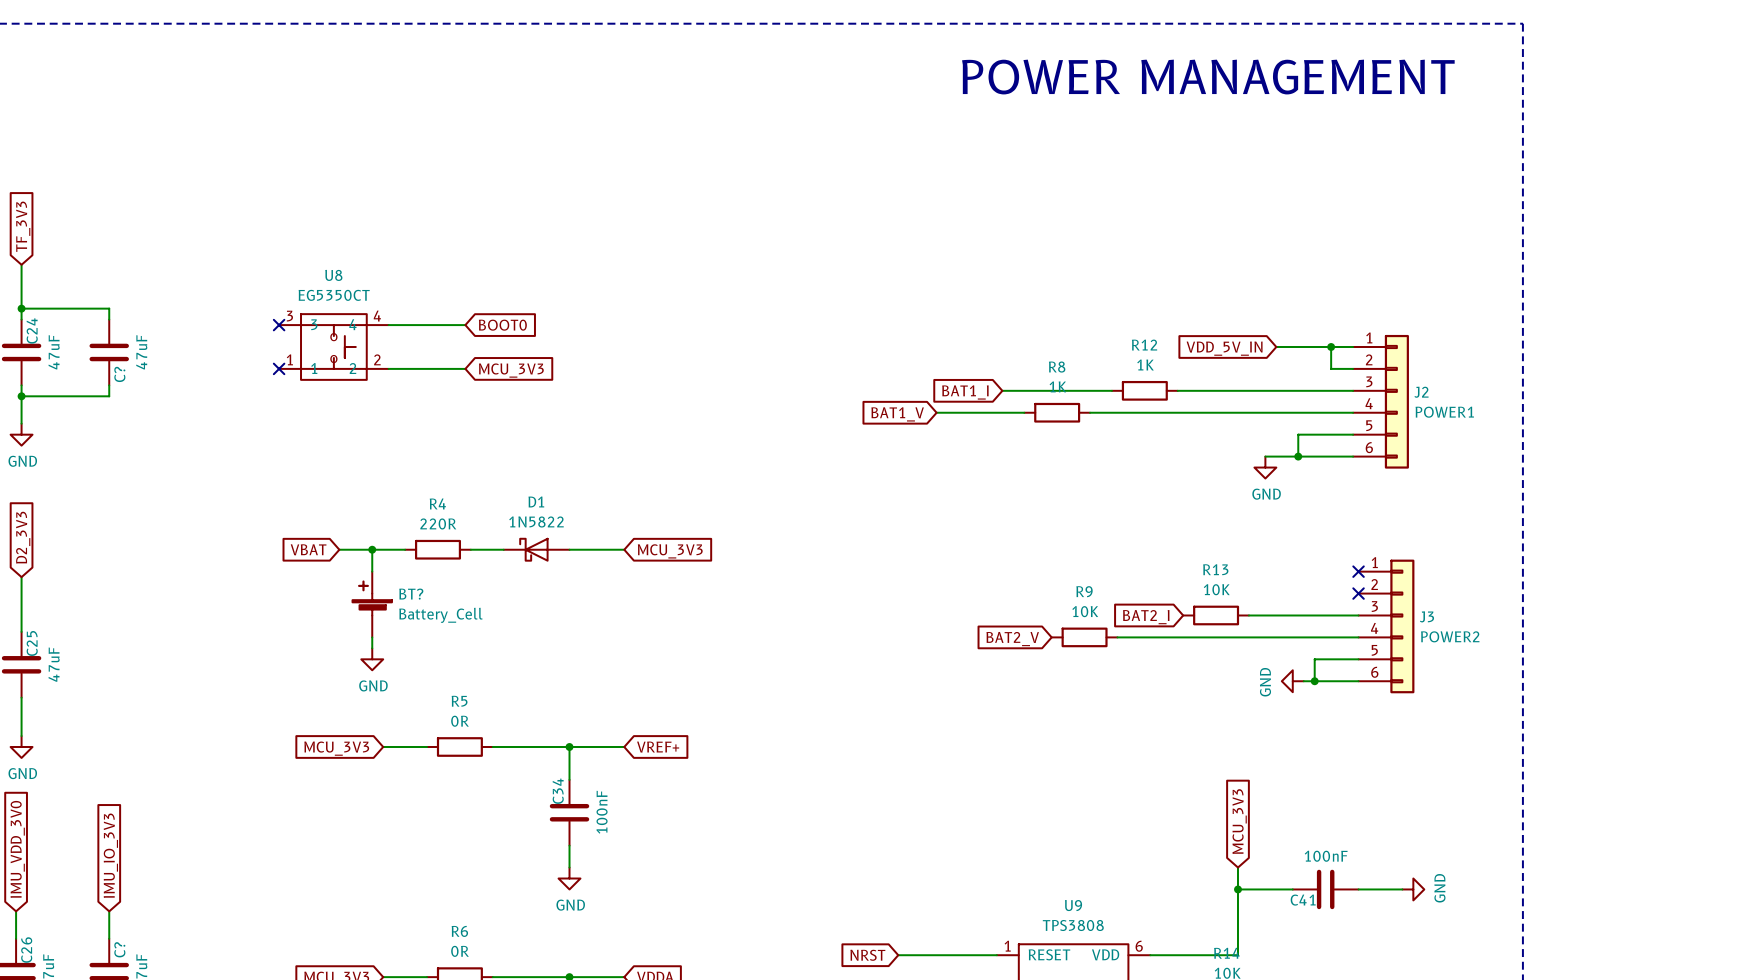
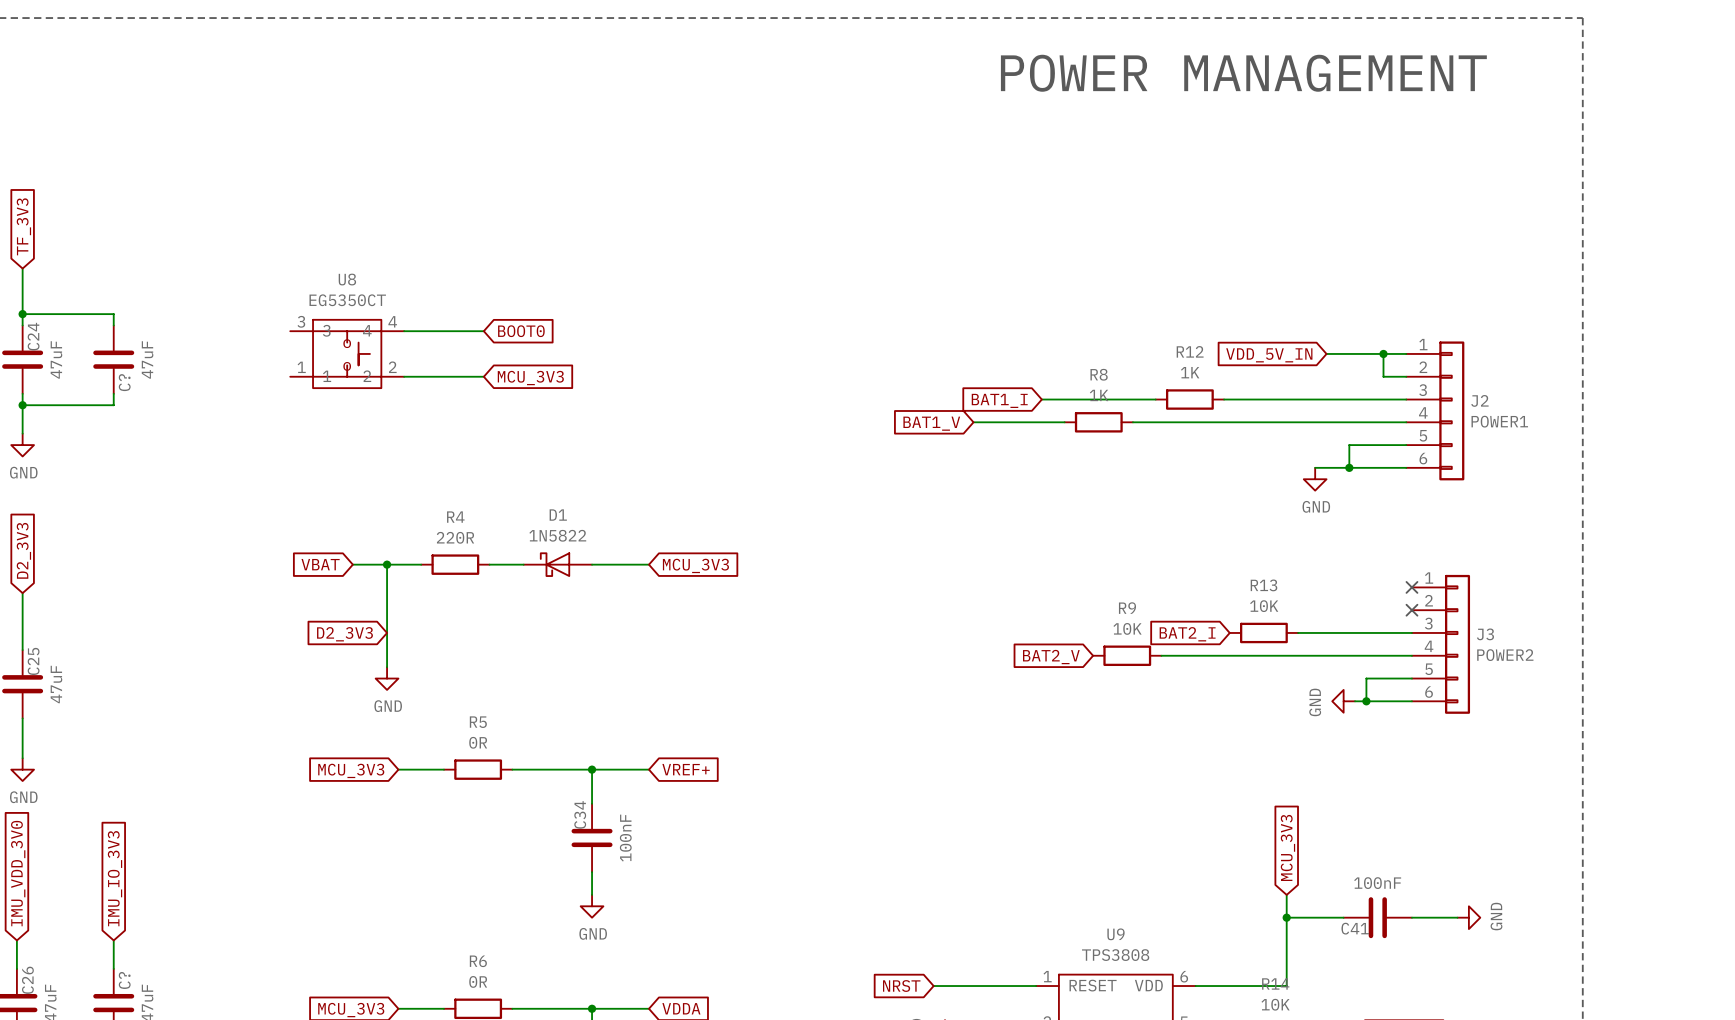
no-connect mark: (279, 325) -> none
no-connect mark: (279, 368) -> none
BT?: Battery_Cell (372, 604) -> none
global label: none -> D2_3V3 (344, 634)

